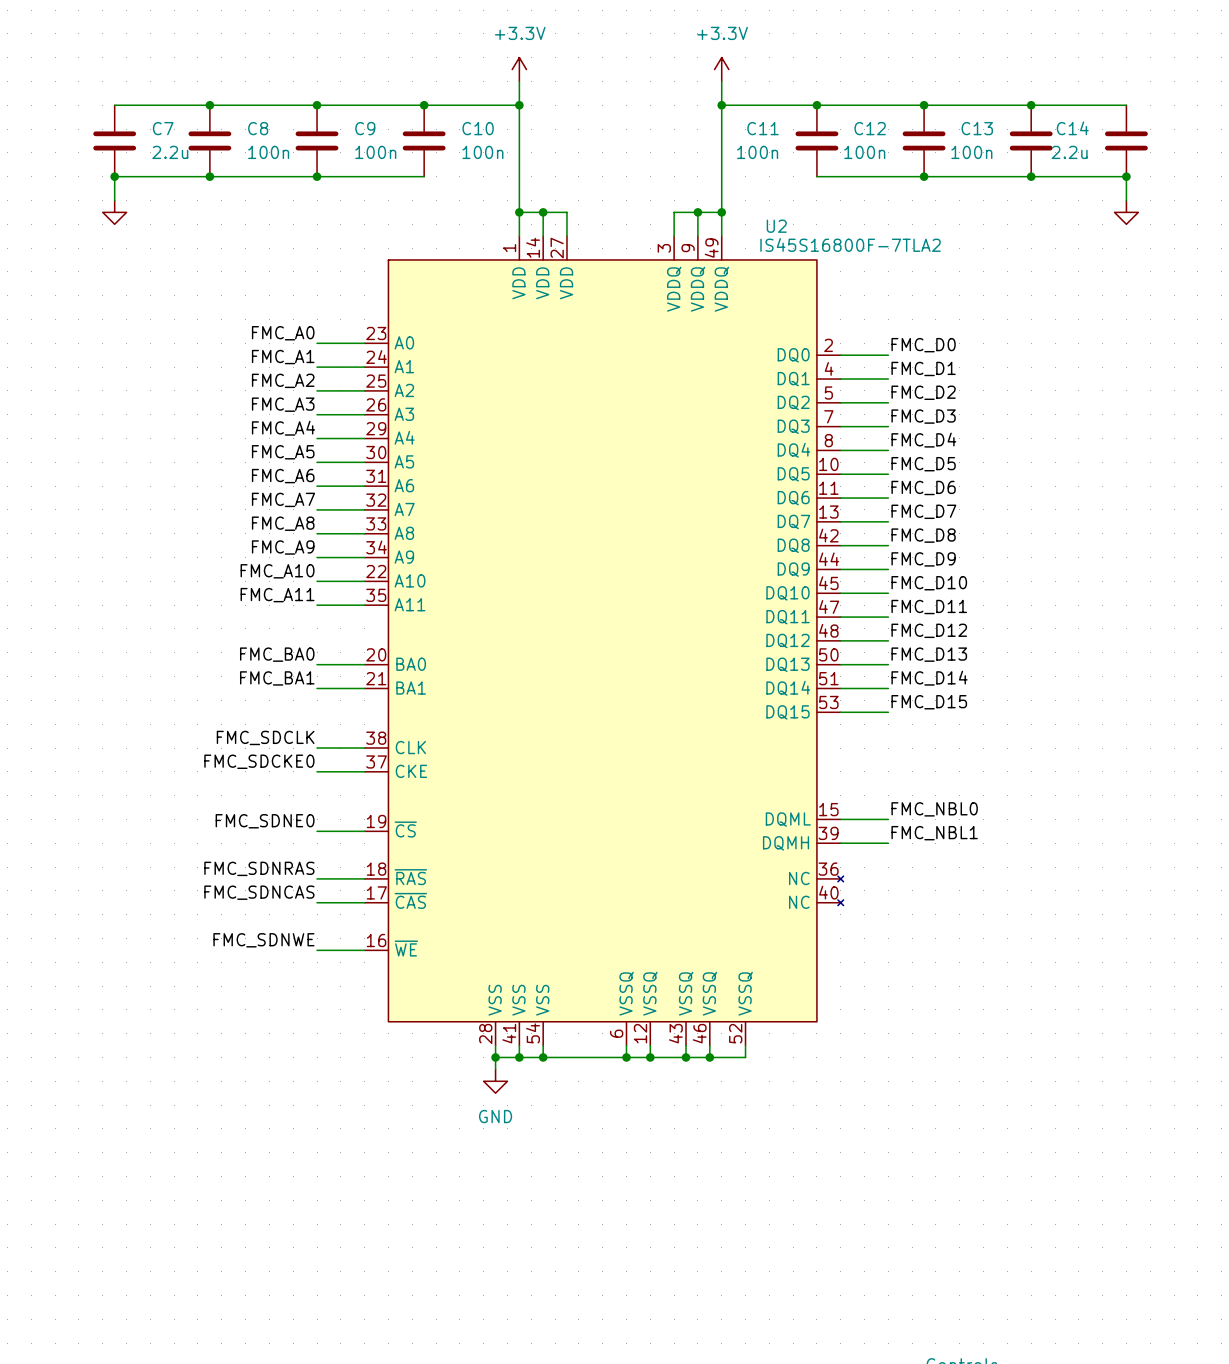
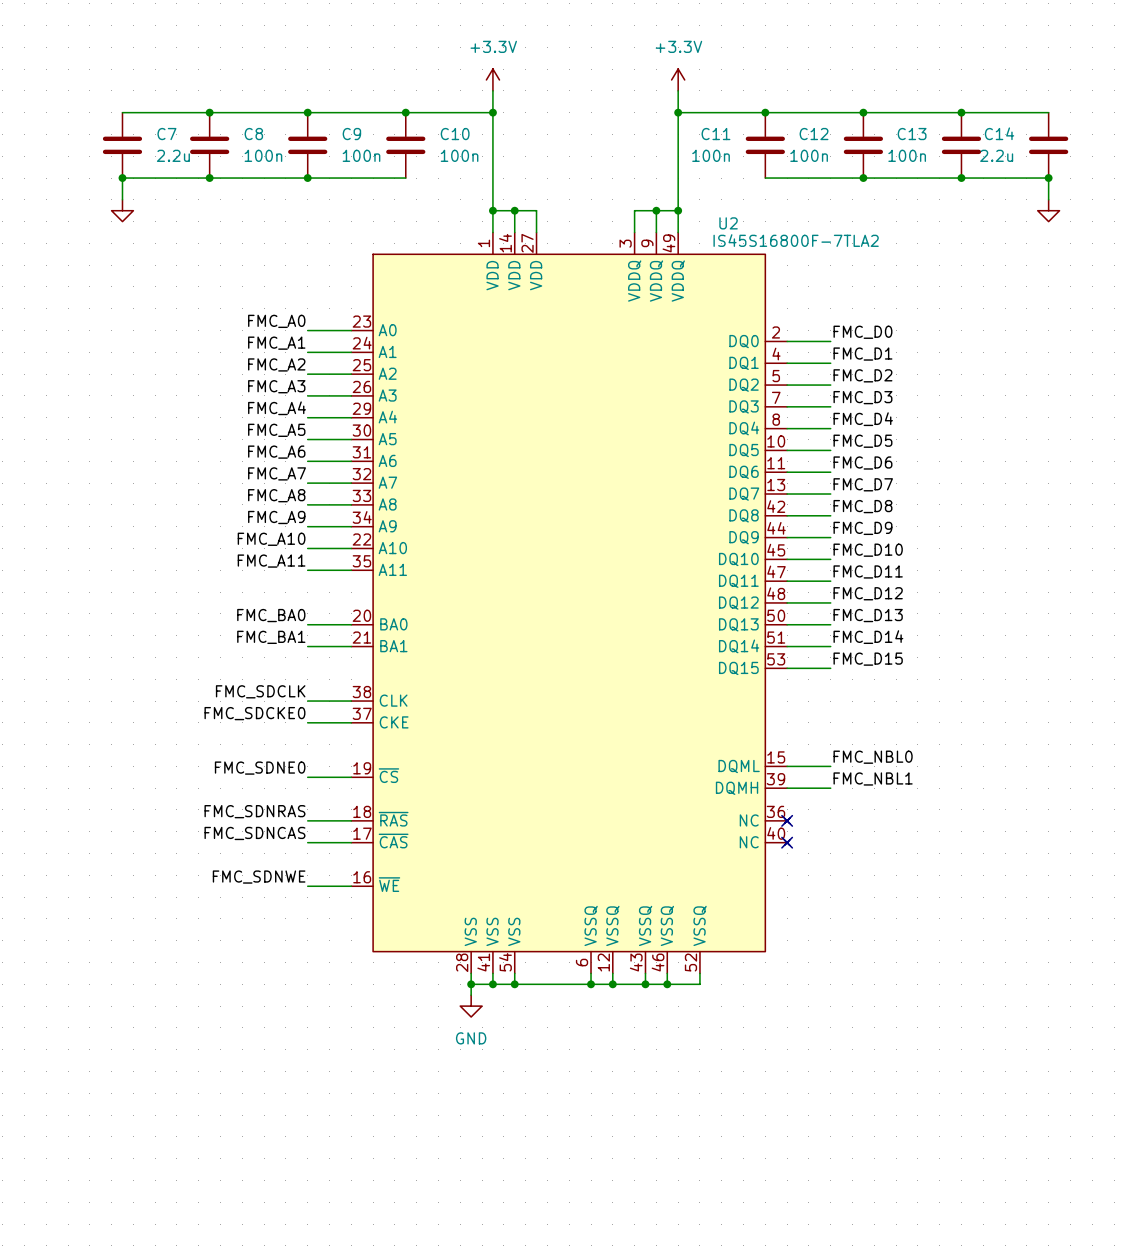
no-connect mark: none -> (787, 820)
no-connect mark: none -> (787, 842)

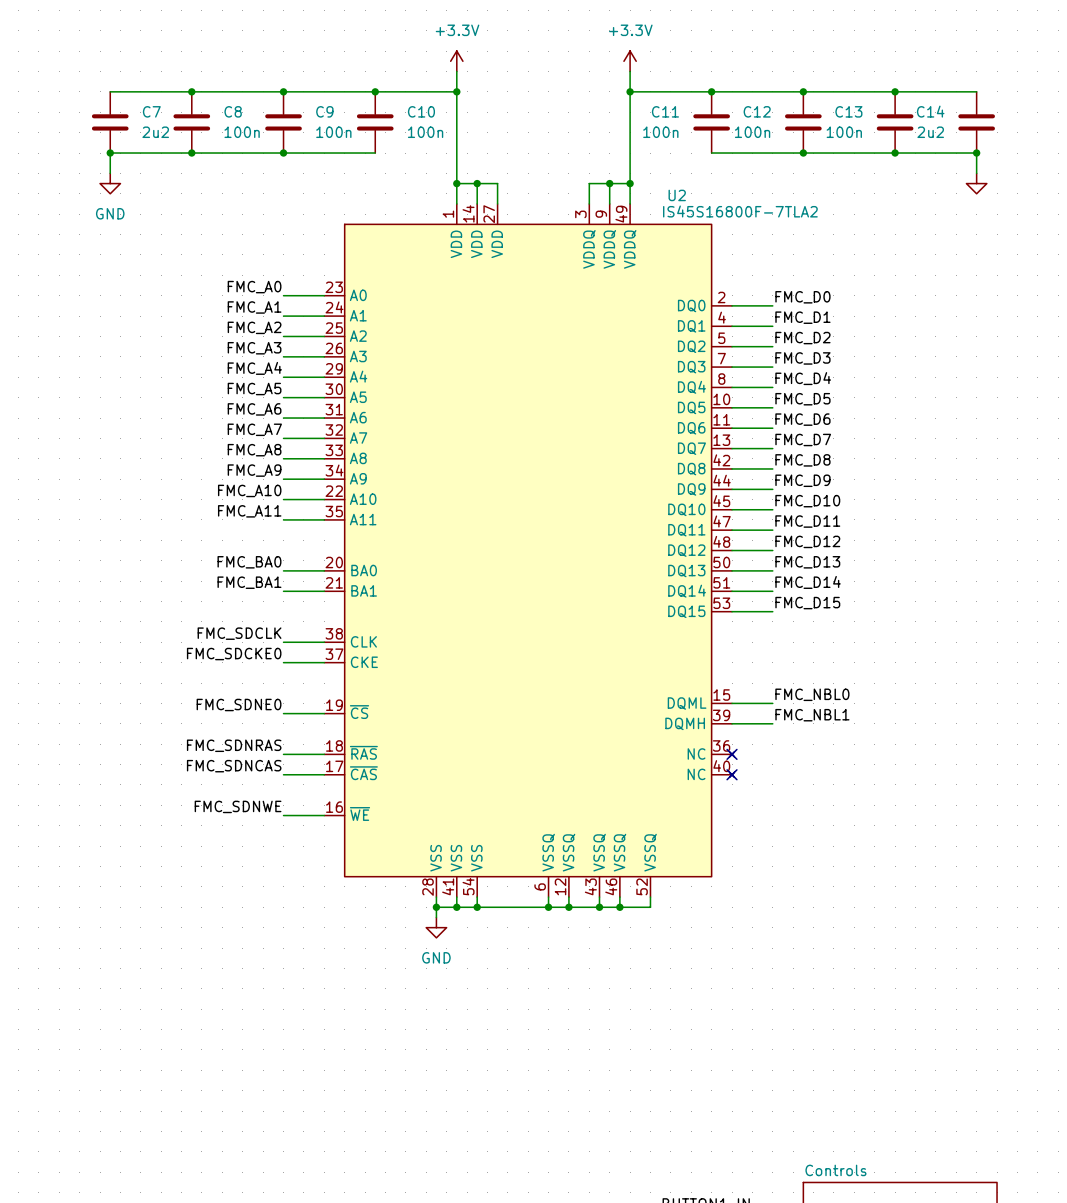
C7 value: 2.2u (173, 155) -> 2u2 (155, 132)
C14 value: 2.2u (996, 155) -> 2u2 (930, 132)
power symbol text: none -> GND (110, 213)

